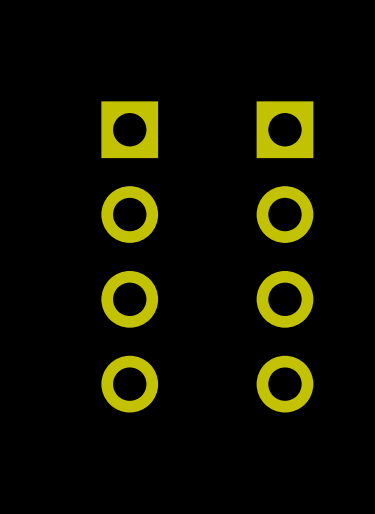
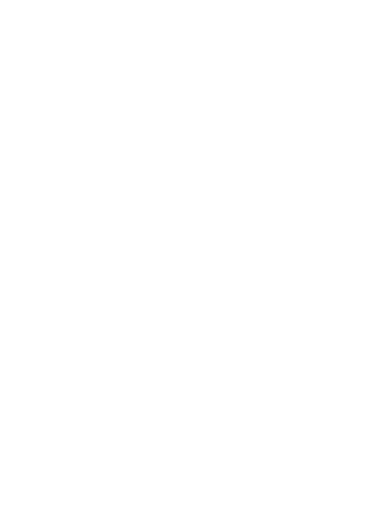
part: (129, 256) -> none
part: (284, 256) -> none

